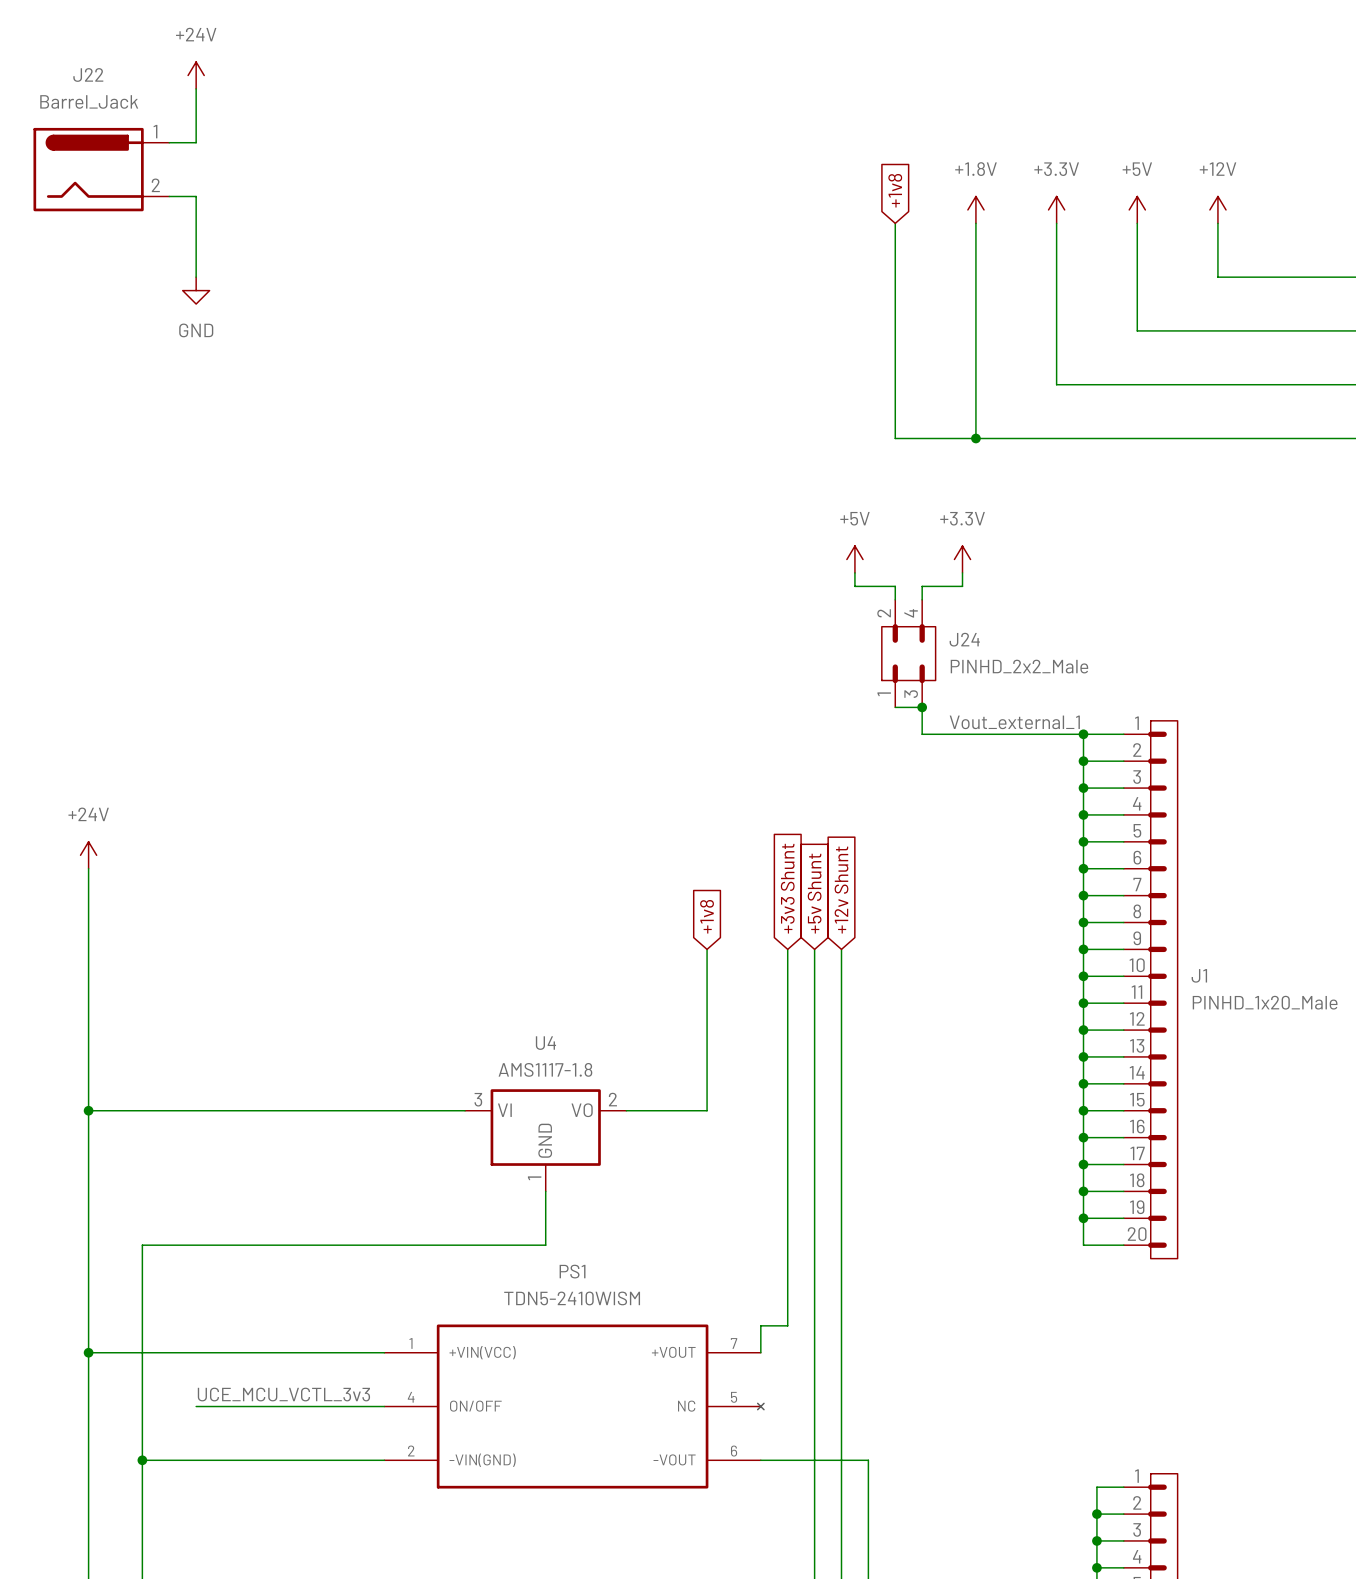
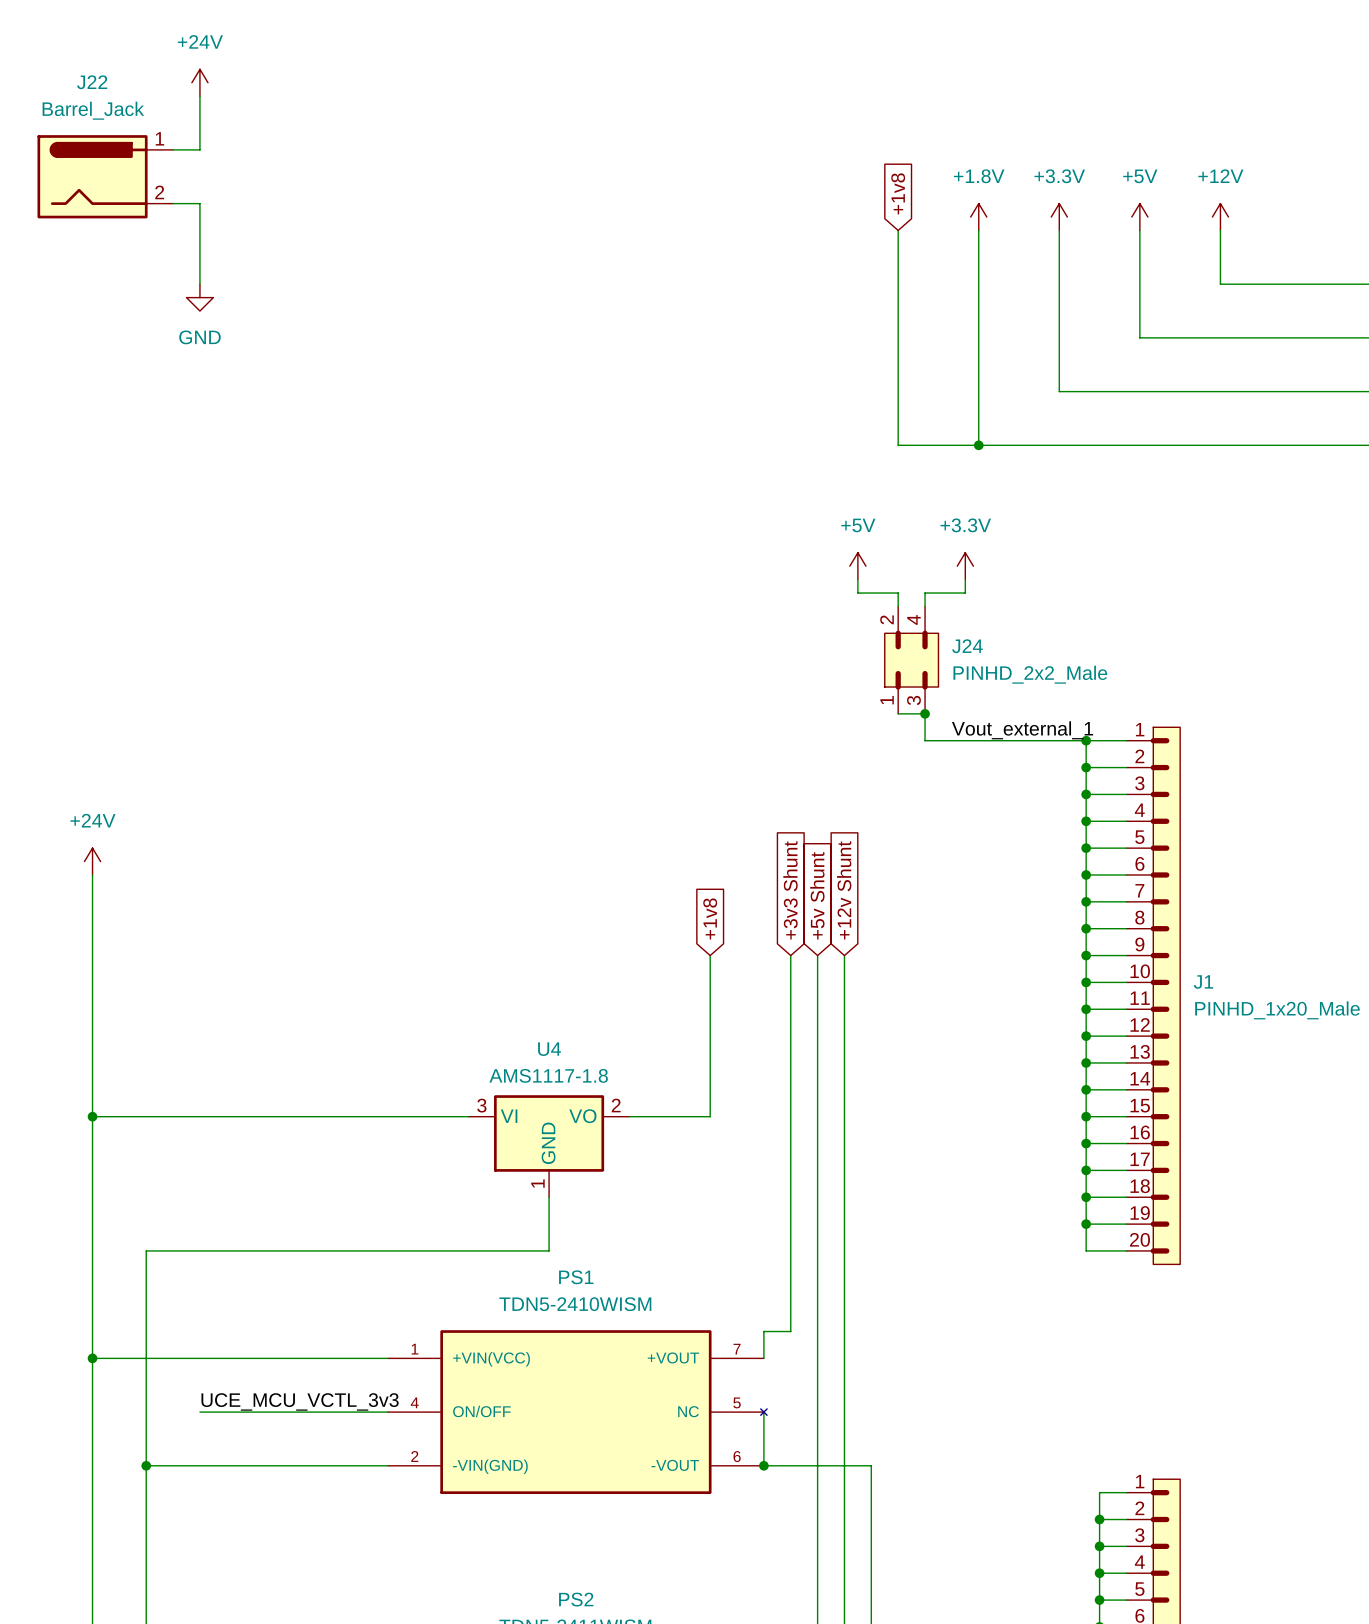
wire: none -> (763, 1412) (763, 1465)
junction: none -> (763, 1465)

